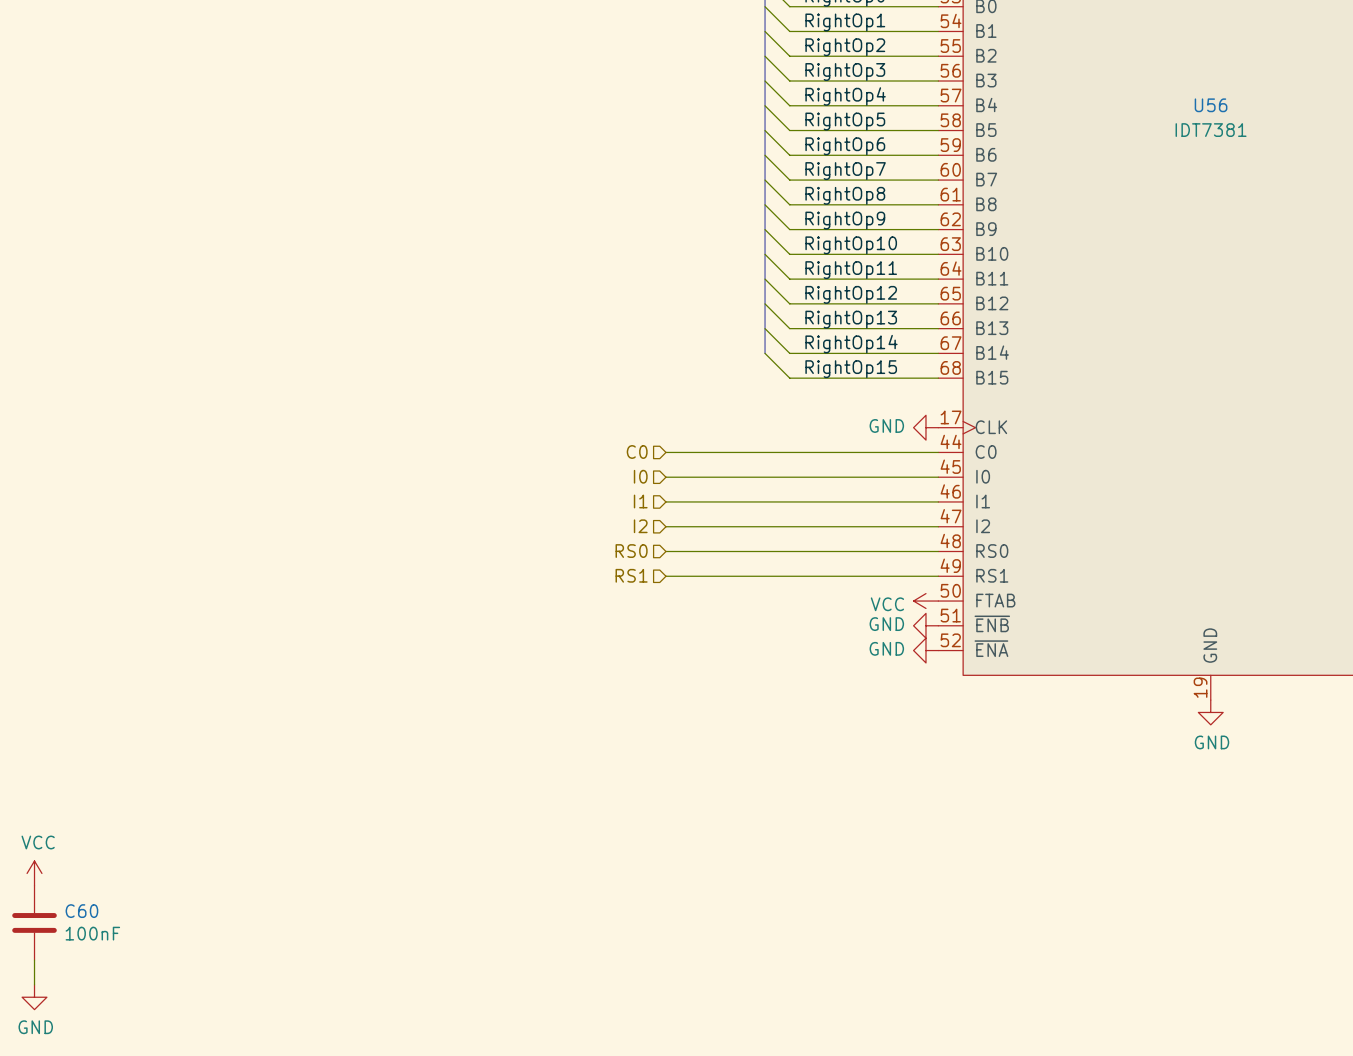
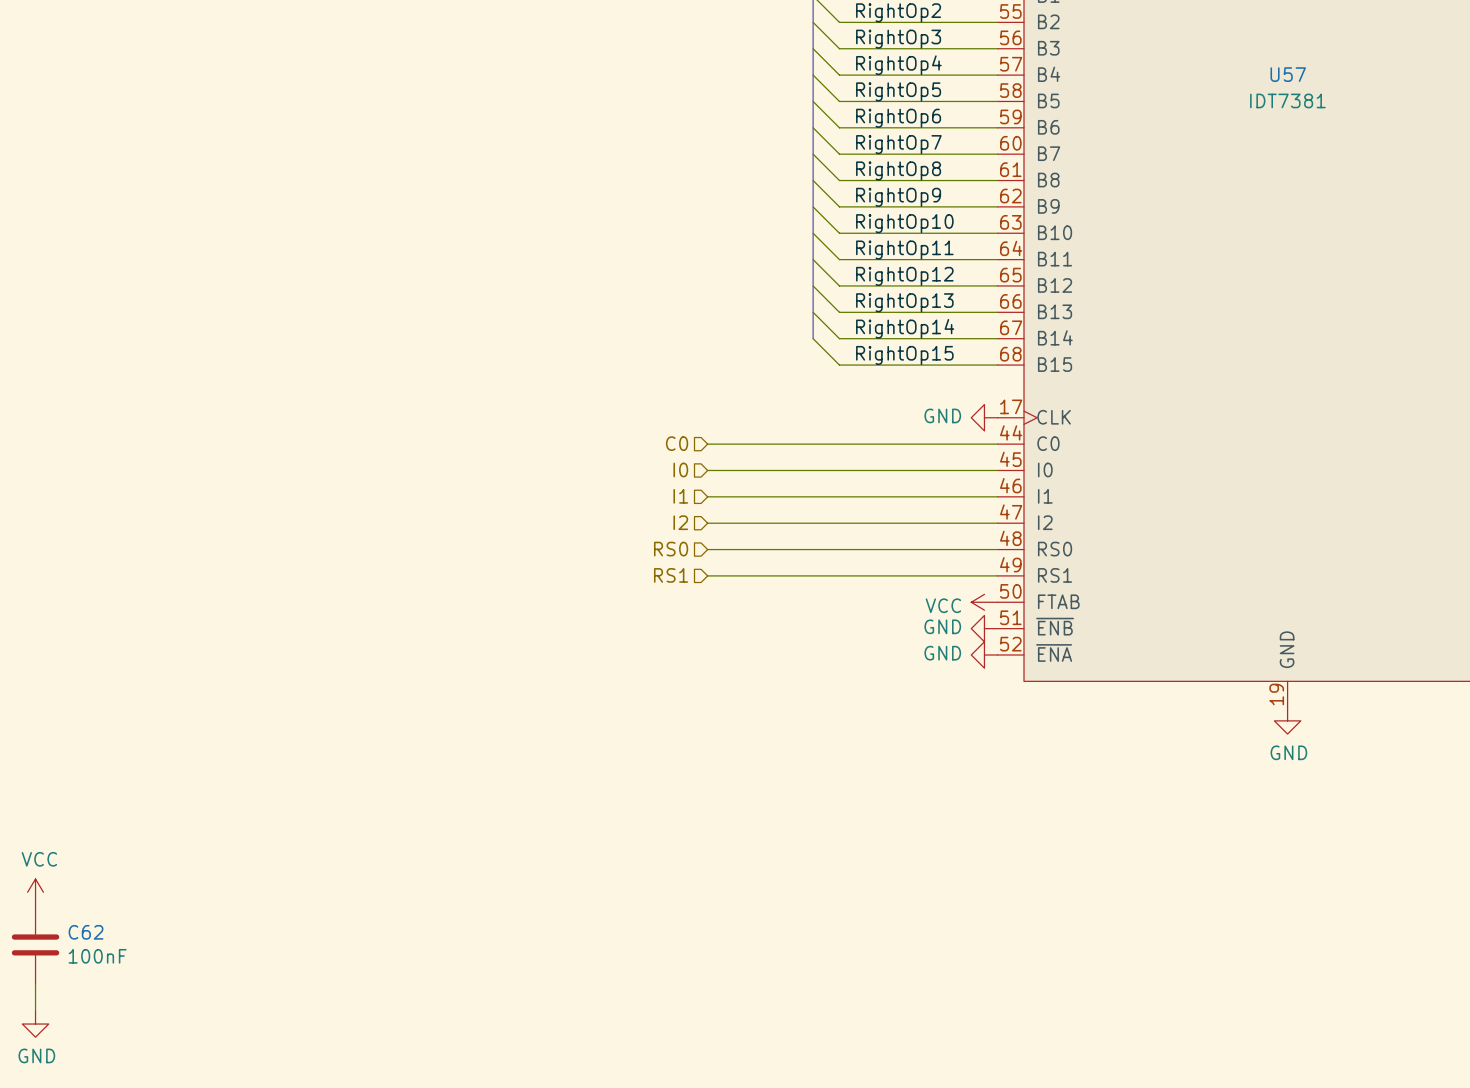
U56 name: U56 (1211, 105) -> U57 (1288, 74)
C60 name: C60 (81, 911) -> C62 (86, 932)

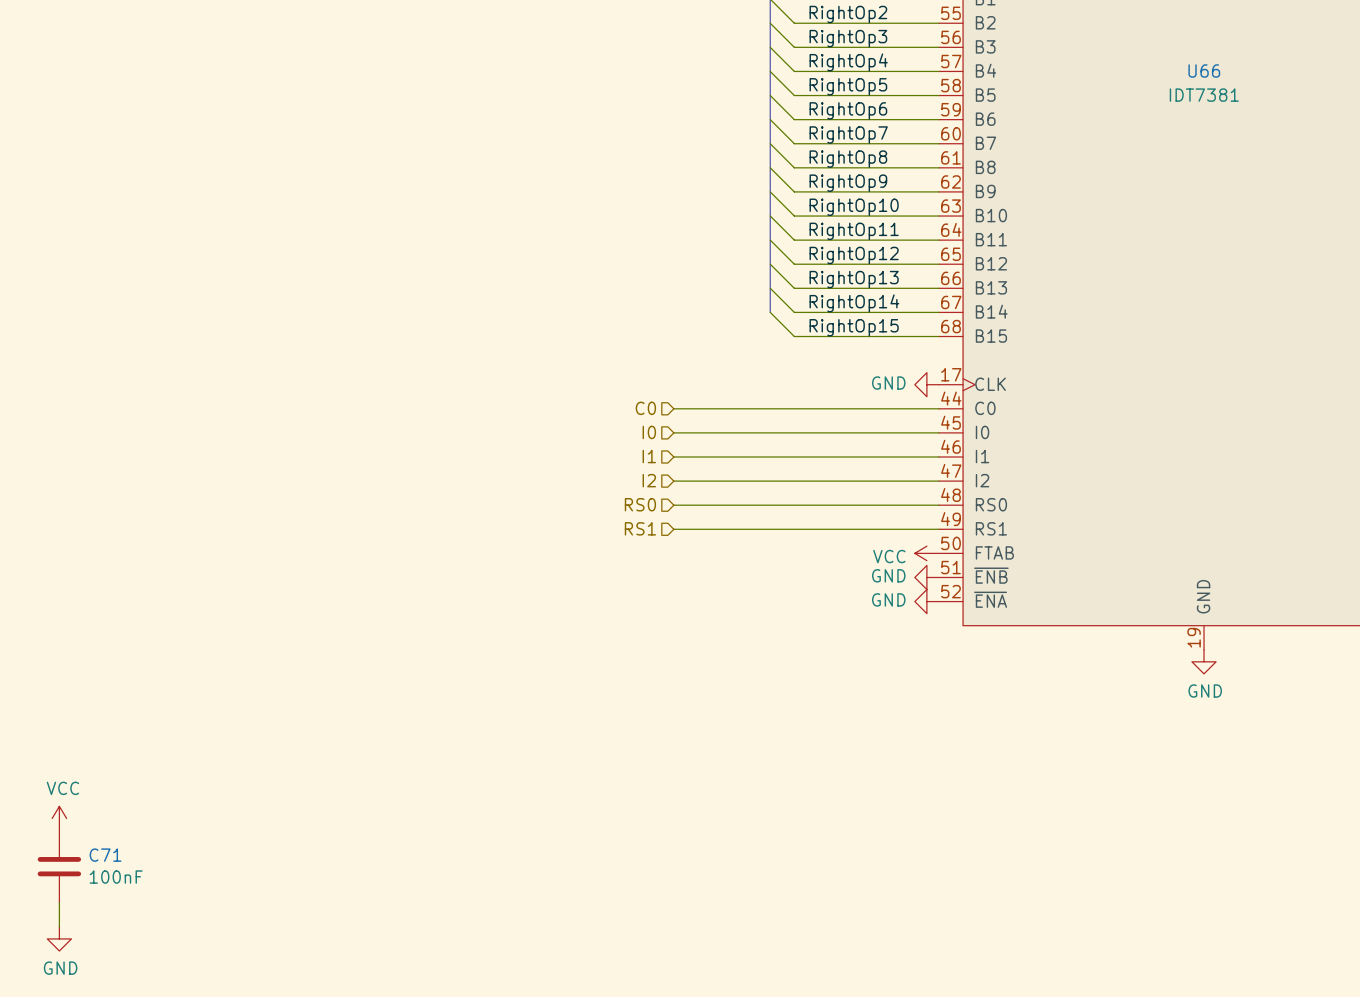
U57 name: U57 (1288, 74) -> U66 (1204, 70)
C62 name: C62 (86, 932) -> C71 (105, 855)

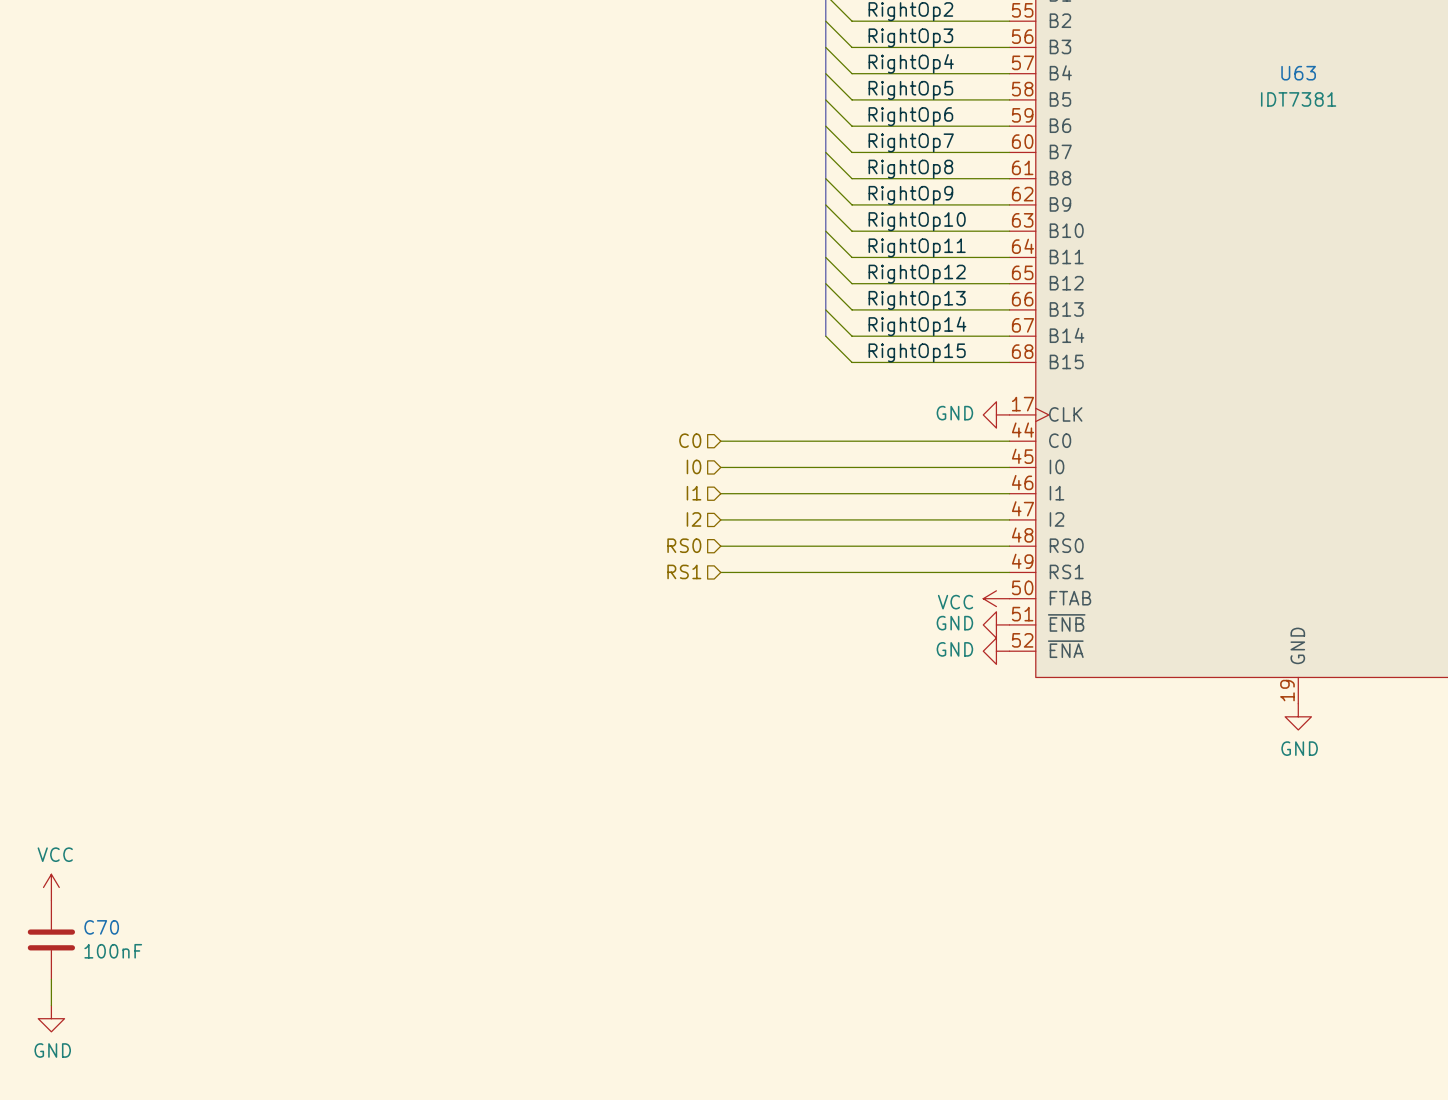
U66 name: U66 (1204, 70) -> U63 (1298, 73)
C71 name: C71 (105, 855) -> C70 (101, 927)

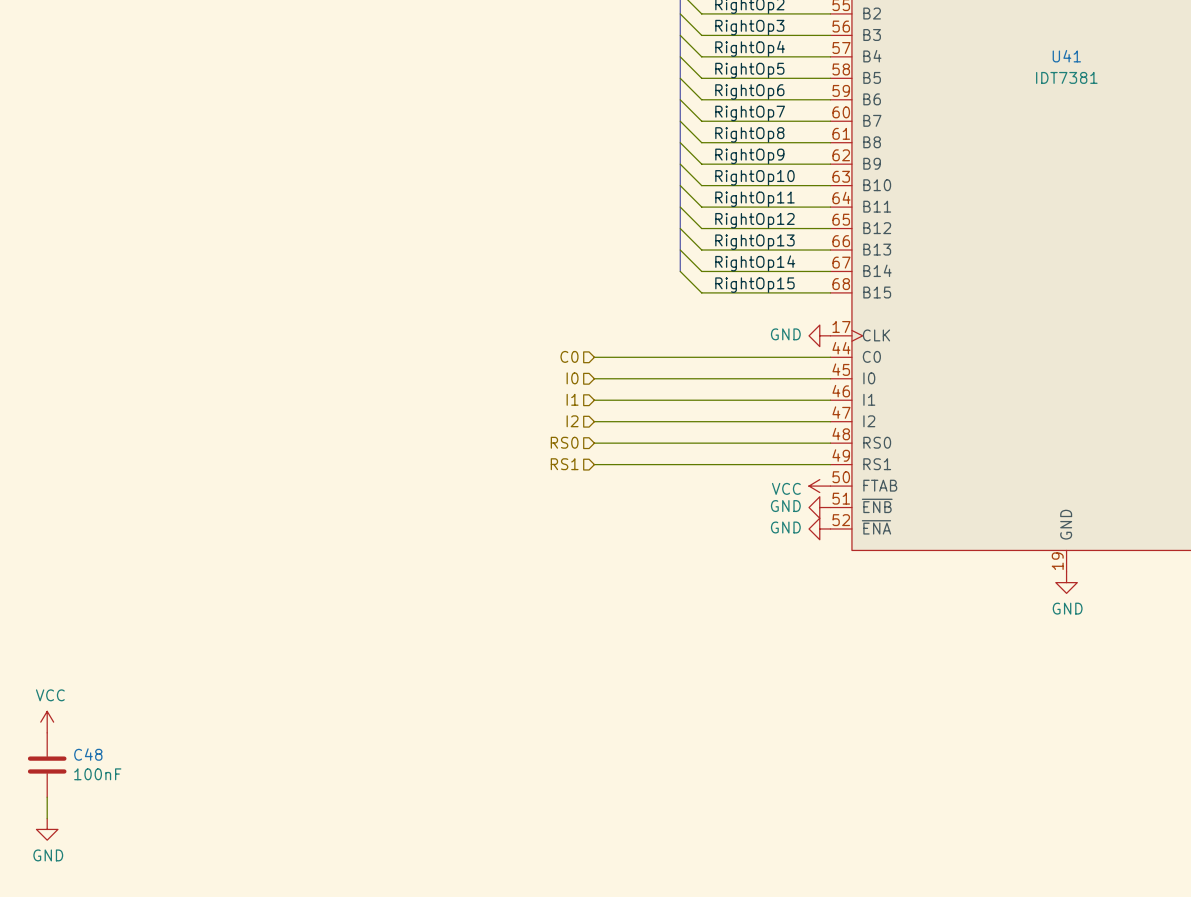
U63 name: U63 (1298, 73) -> U41 (1066, 56)
C70 name: C70 (101, 927) -> C48 (88, 754)

